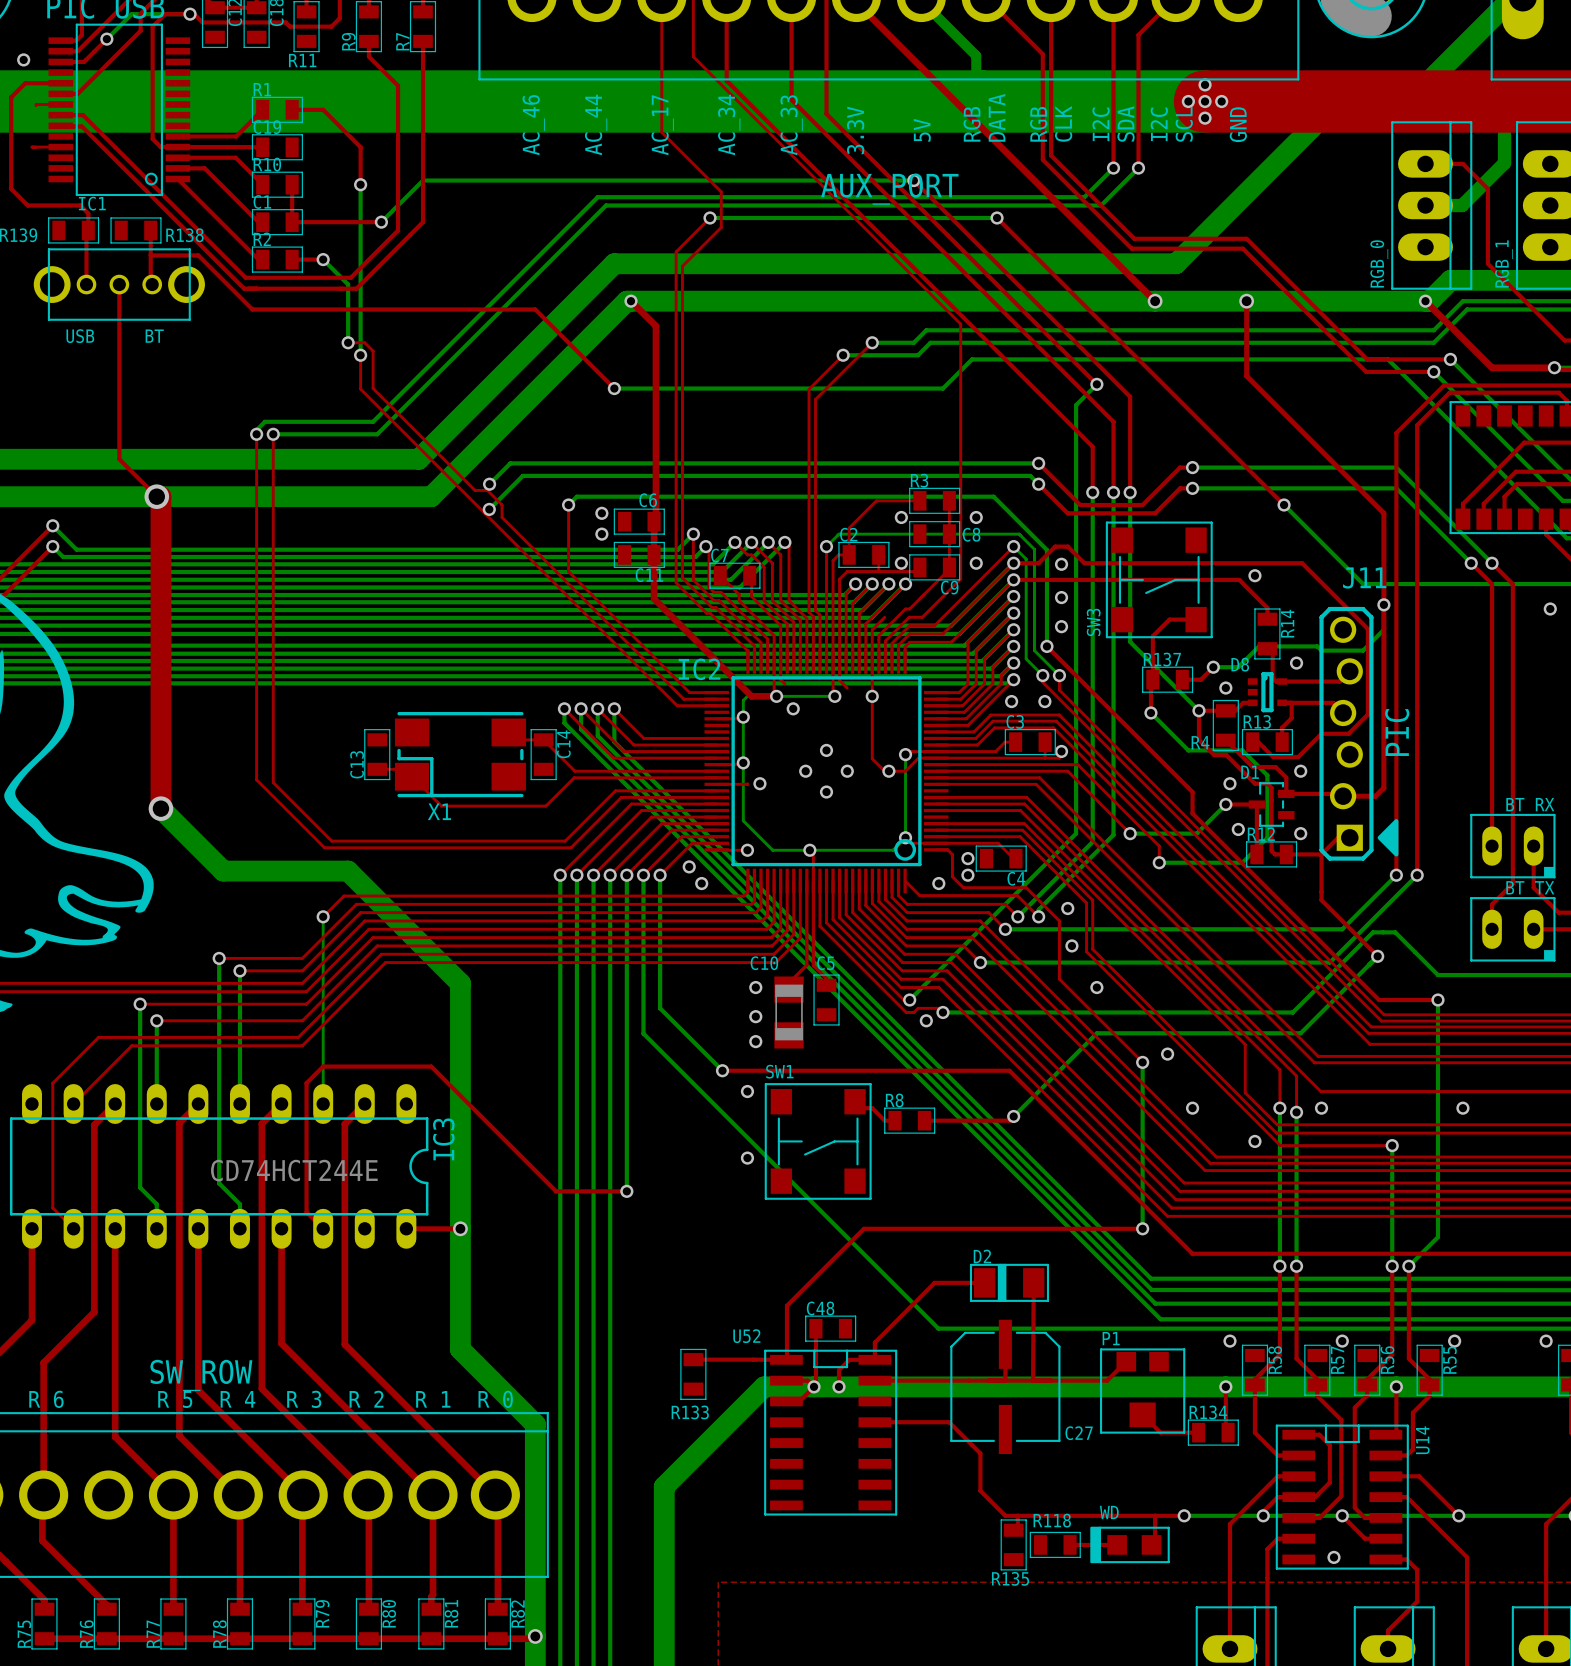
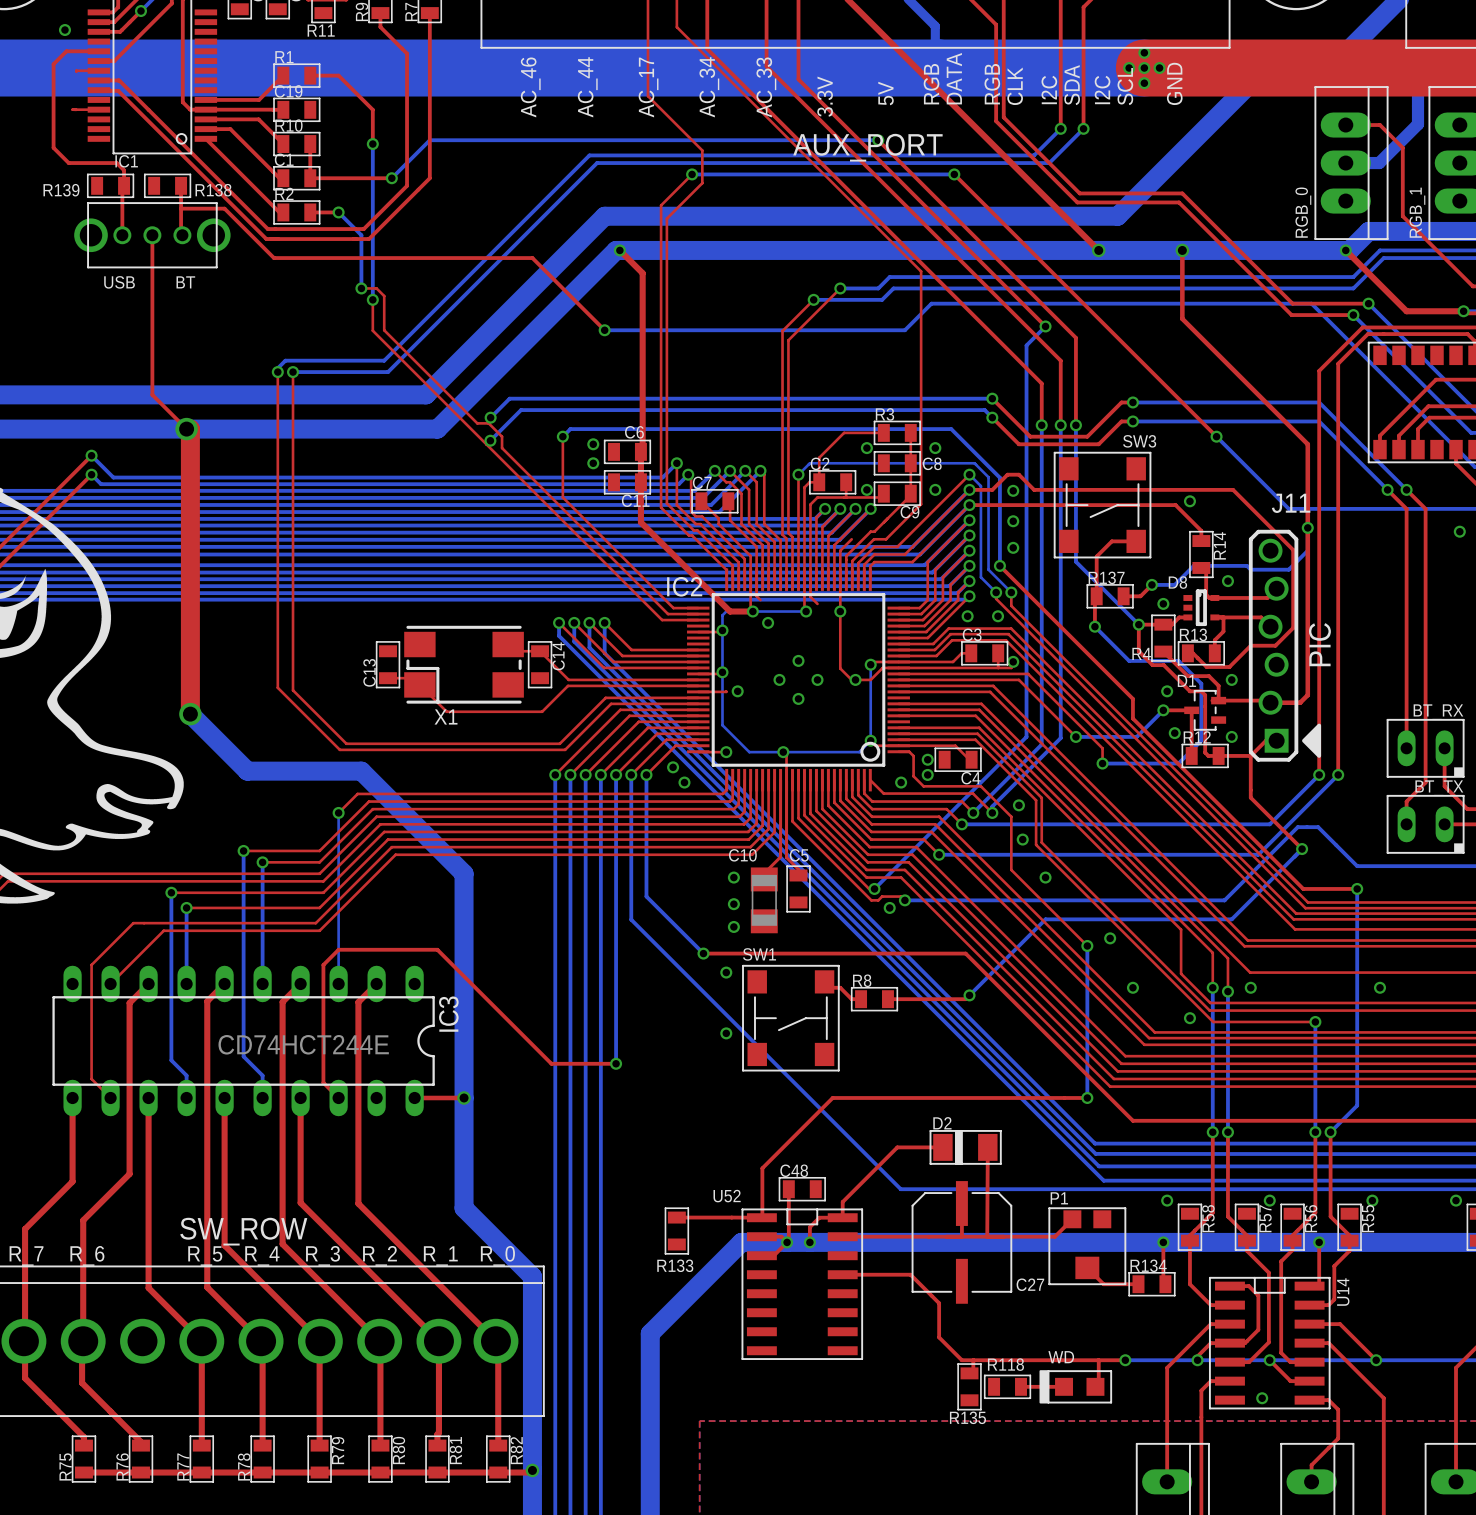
SW3 name rotation: 0° (1093, 622) -> 90° clockwise (1139, 441)
SW3 name position: SW3 (1093, 622) -> SW3 (1139, 441)

